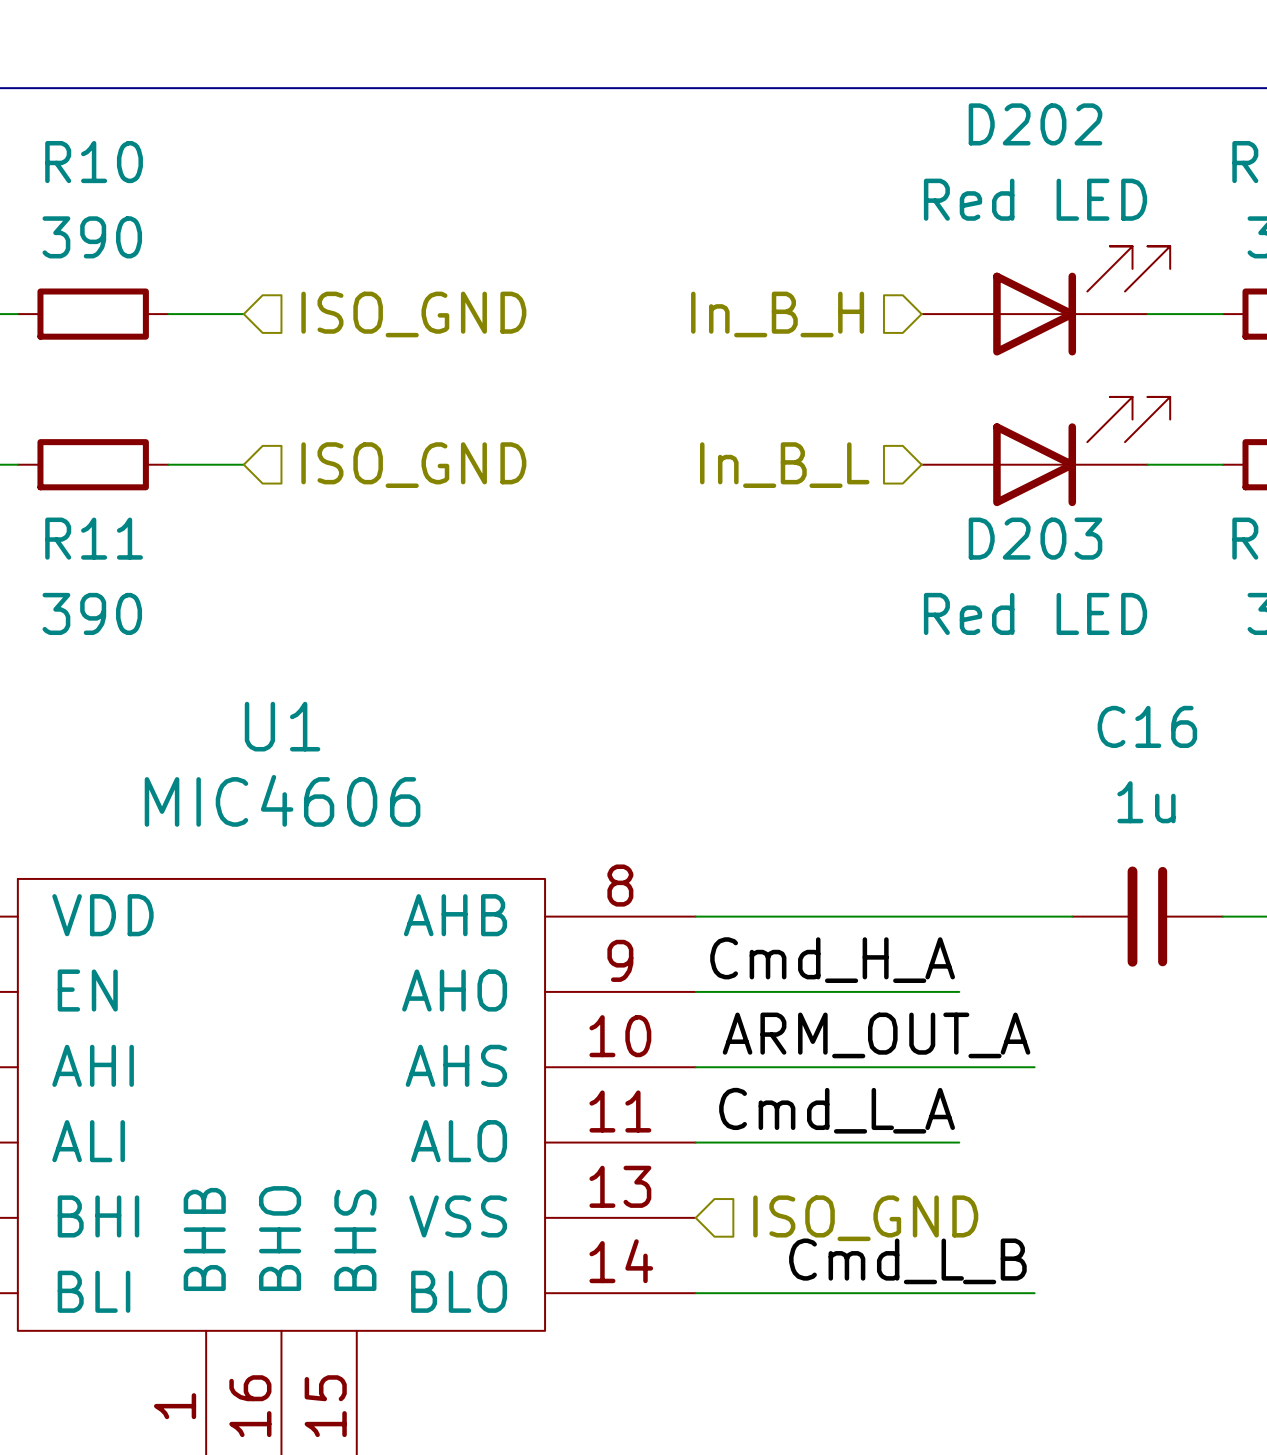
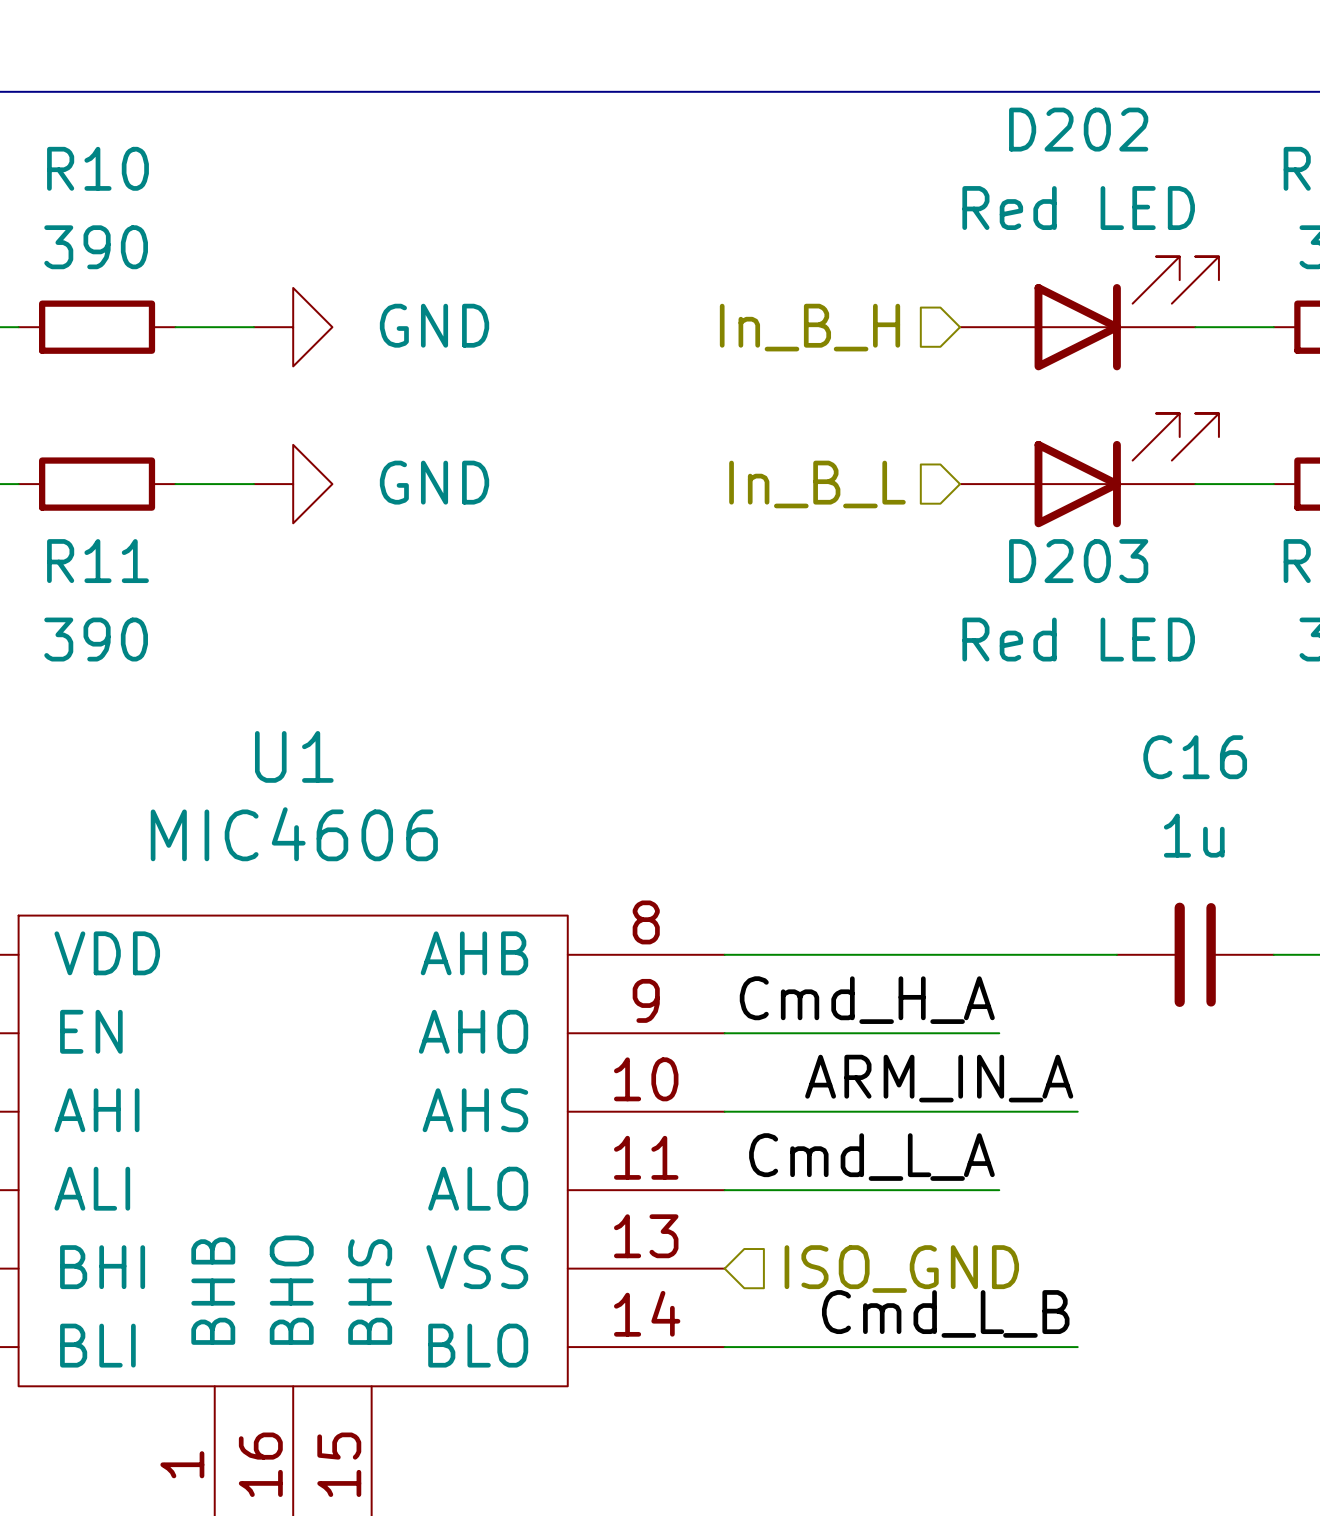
power symbol: none -> GND (293, 327)
hierarchical label: ISO_GND (413, 314) -> none
power symbol: none -> GND (293, 484)
hierarchical label: ISO_GND (413, 465) -> none
label: ARM_OUT_A (876, 1035) -> ARM_IN_A (939, 1078)

